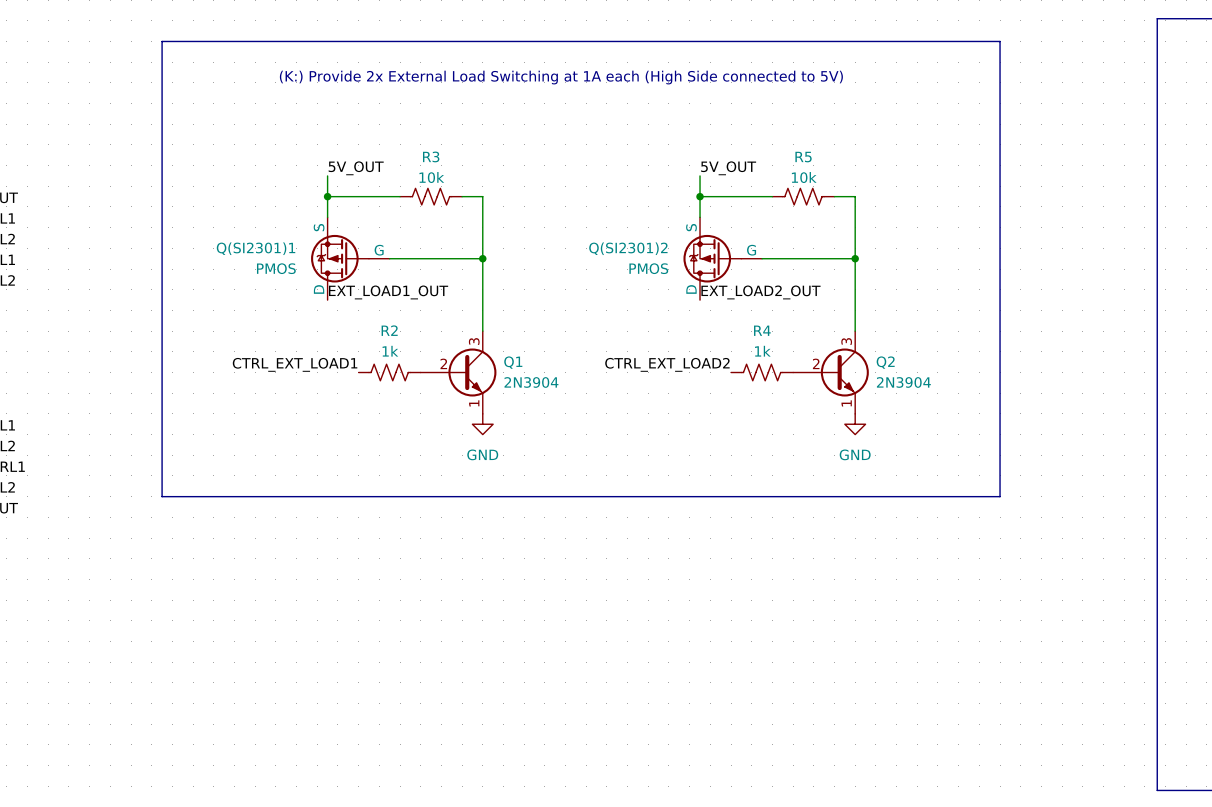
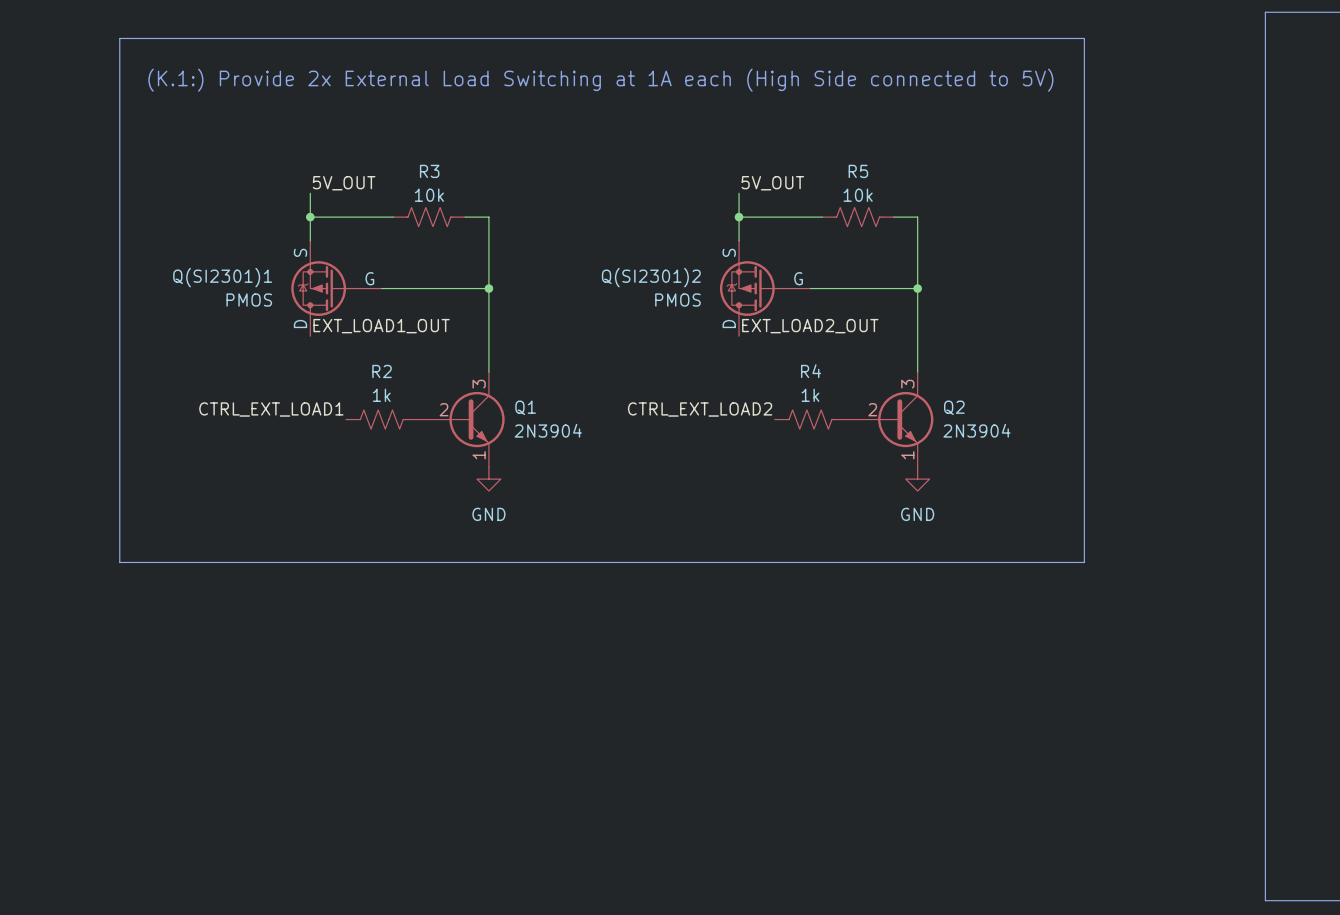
text: (K:) Provide 2x External Load Switching at 1A each (High Side connected to 5V) (561, 77) -> (K.1:) Provide 2x External Load Switching at 1A each (High Side connected to 5V) (600, 80)

